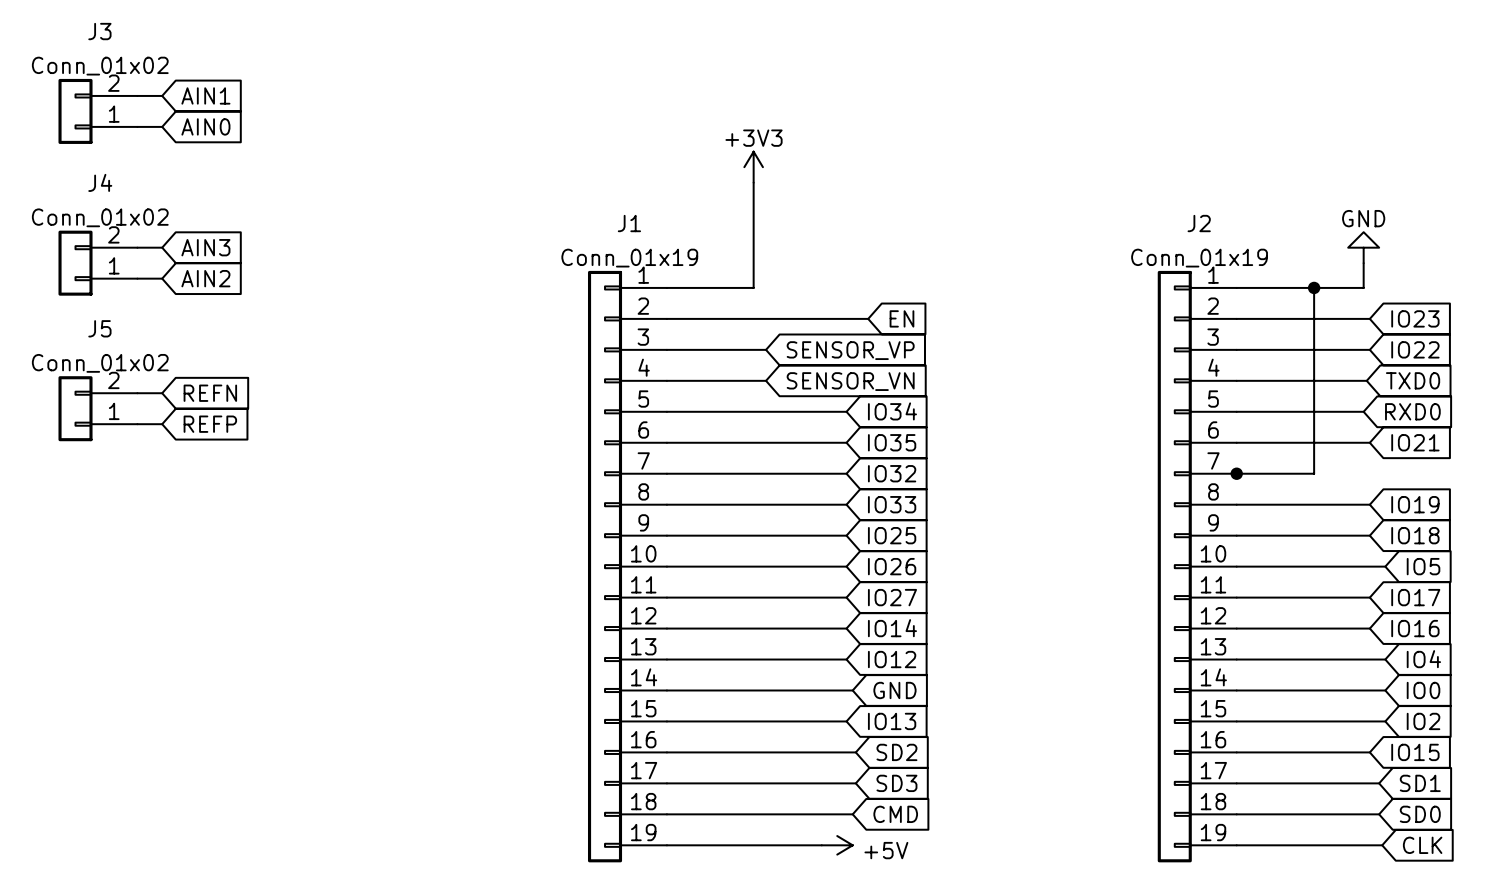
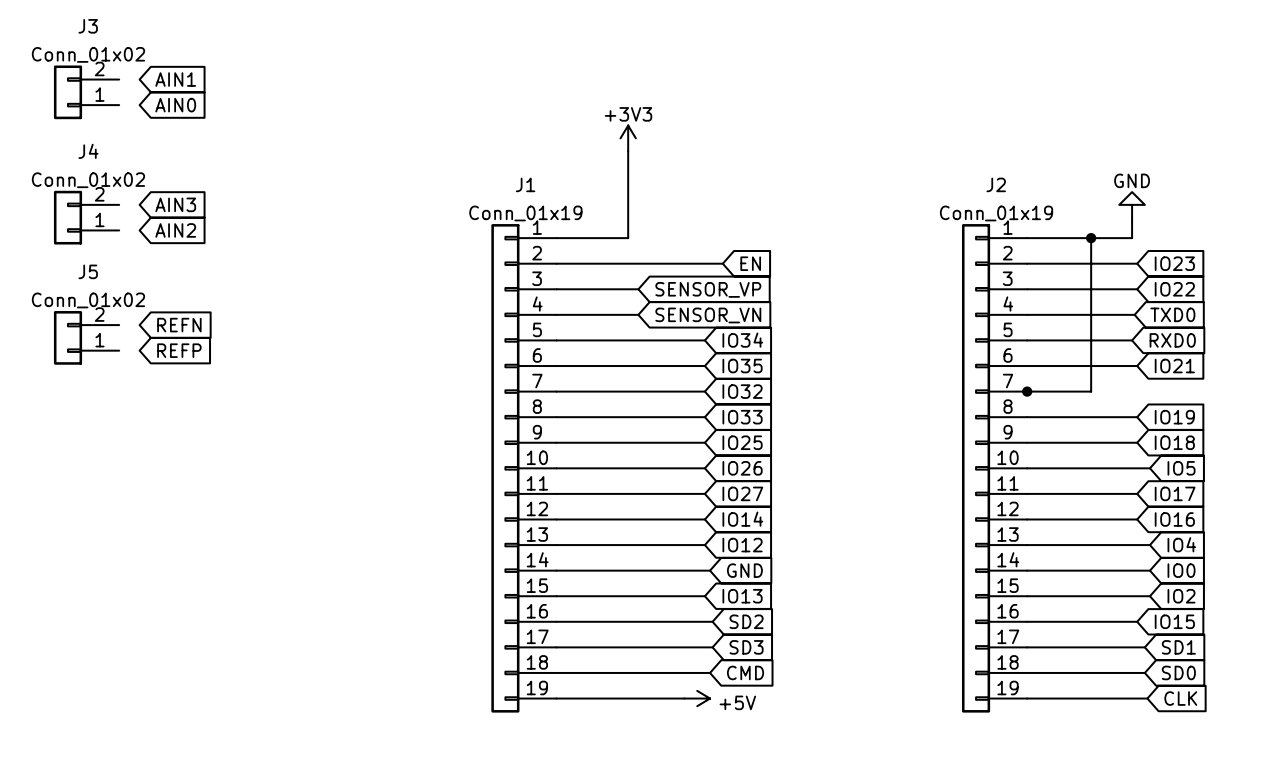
wire: (137, 95) (162, 95) -> none
wire: (137, 126) (162, 126) -> none
wire: (137, 247) (162, 247) -> none
wire: (137, 278) (162, 278) -> none
wire: (137, 393) (162, 393) -> none
wire: (137, 424) (162, 424) -> none

